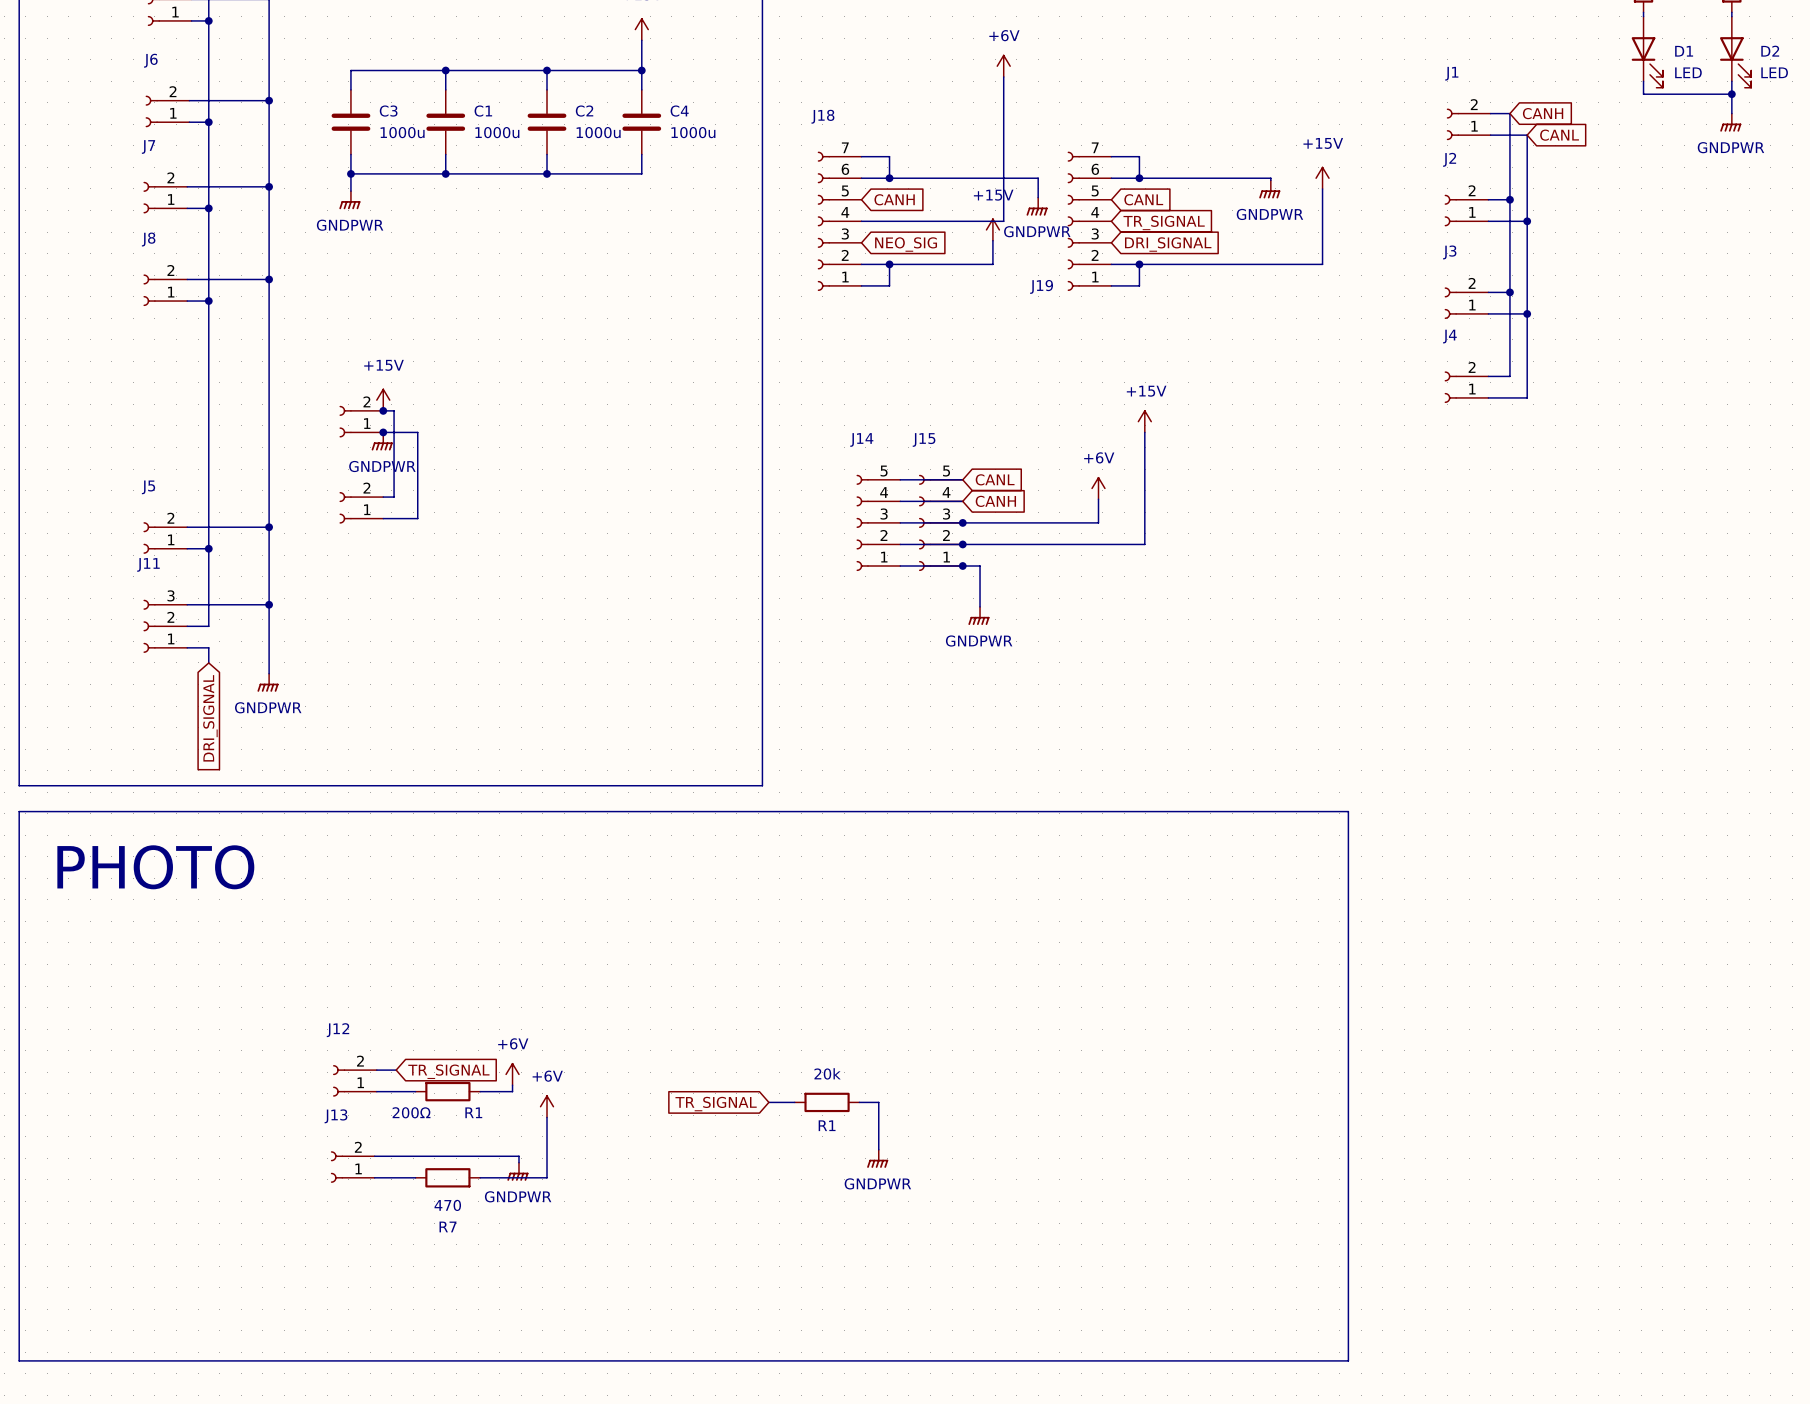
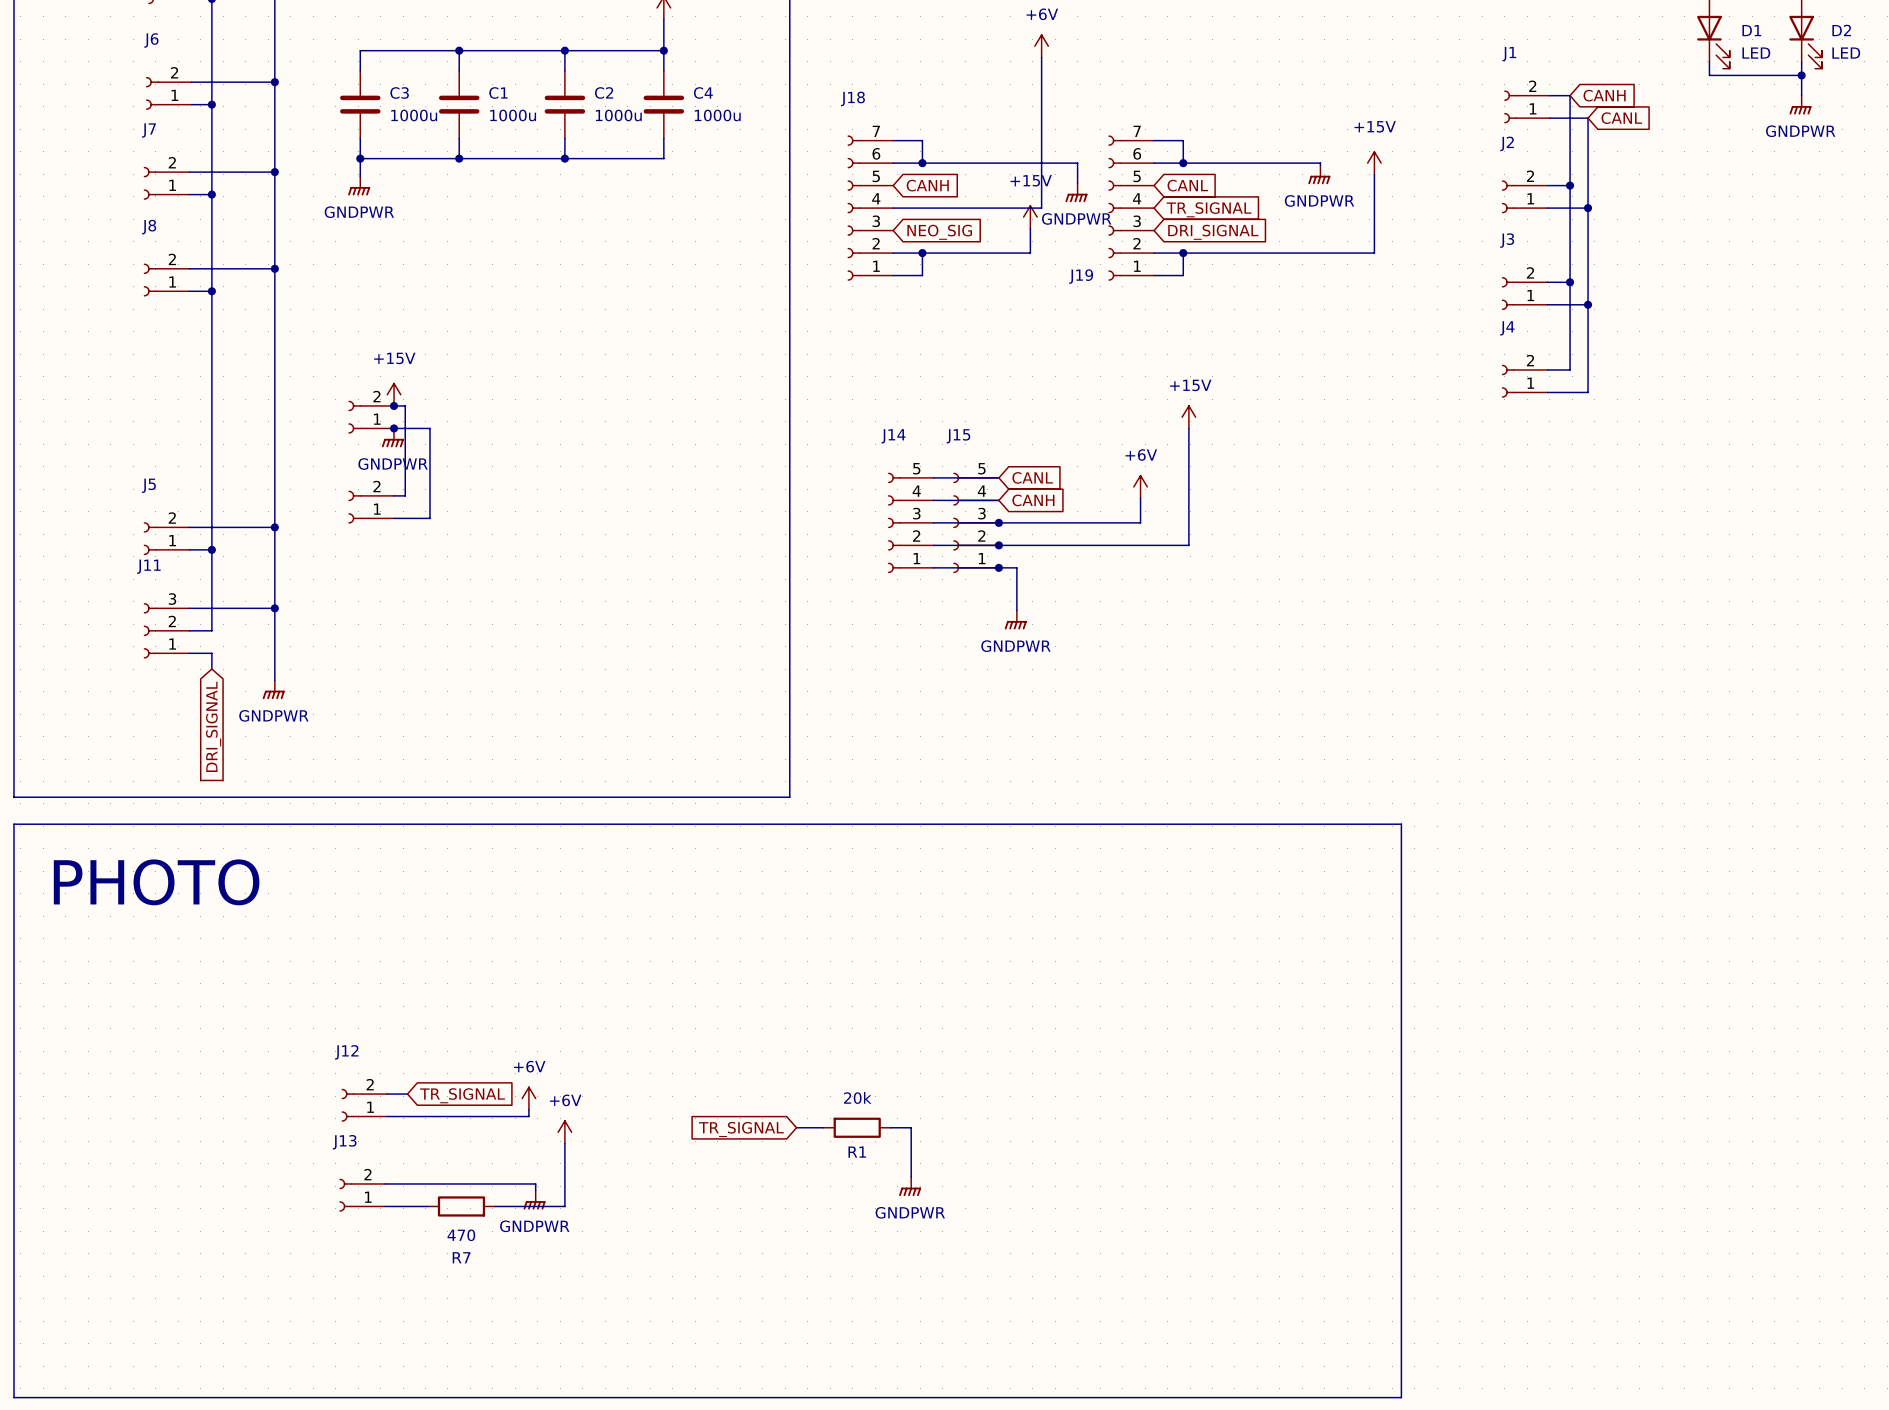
wire: none -> (427, 1116) (495, 1116)
R1: 200Ω (447, 1091) -> none

